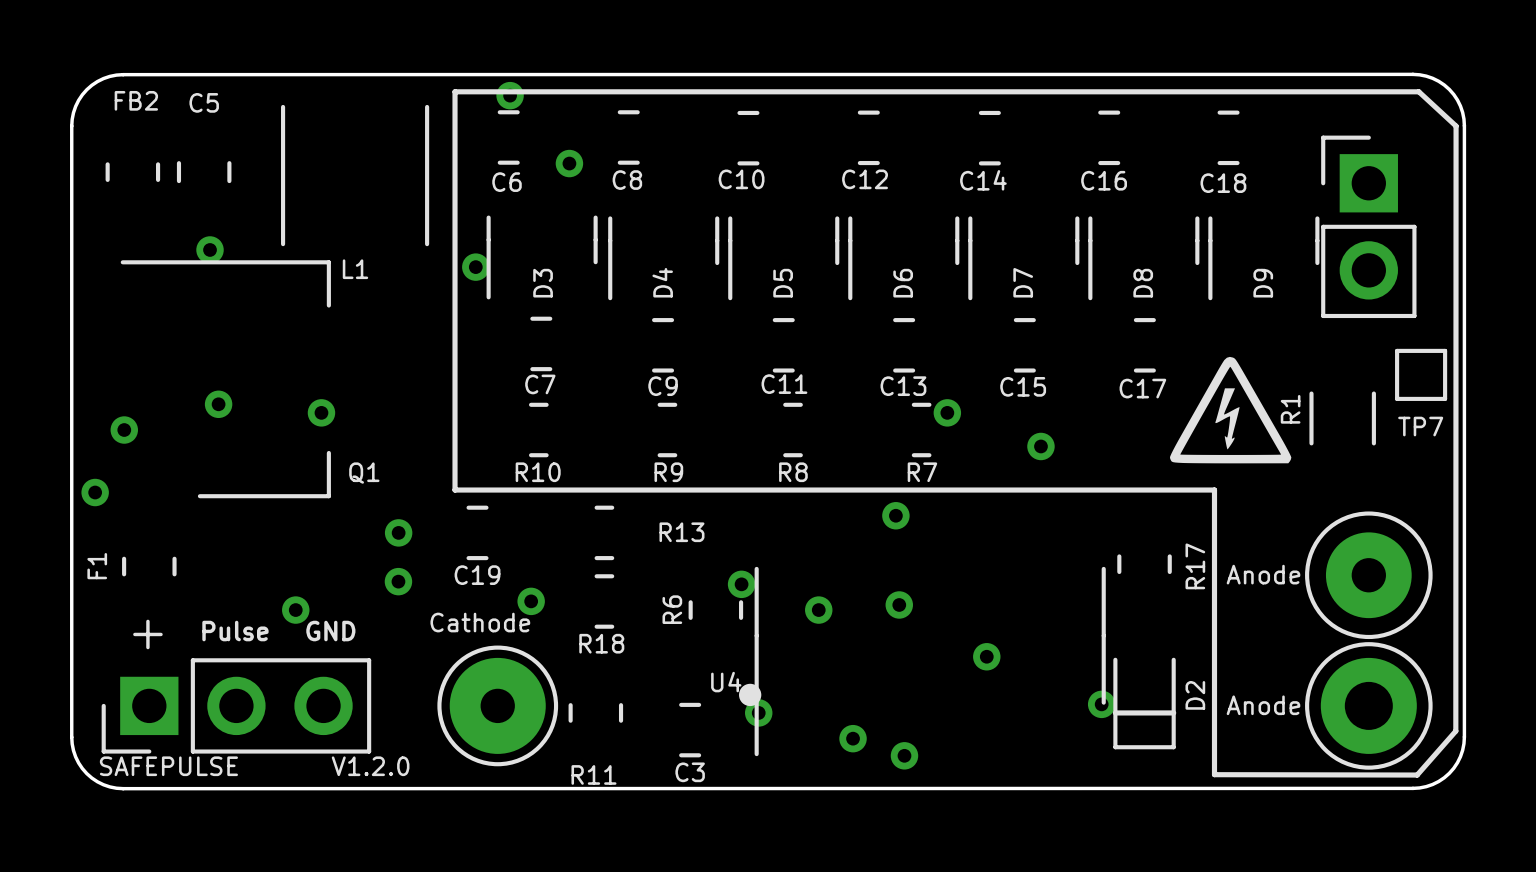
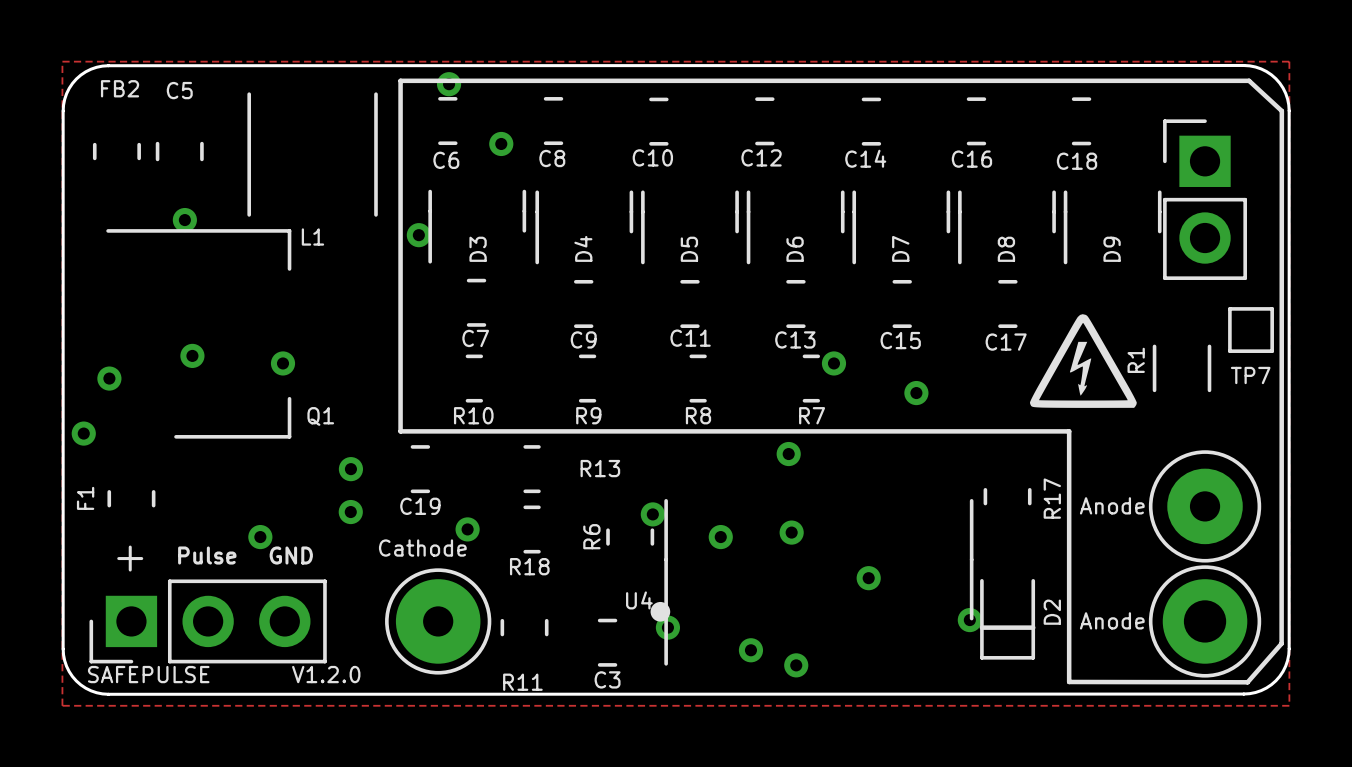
zone outline: none -> (62, 61) (62, 705) (1289, 705) (1289, 61) (62, 61)

